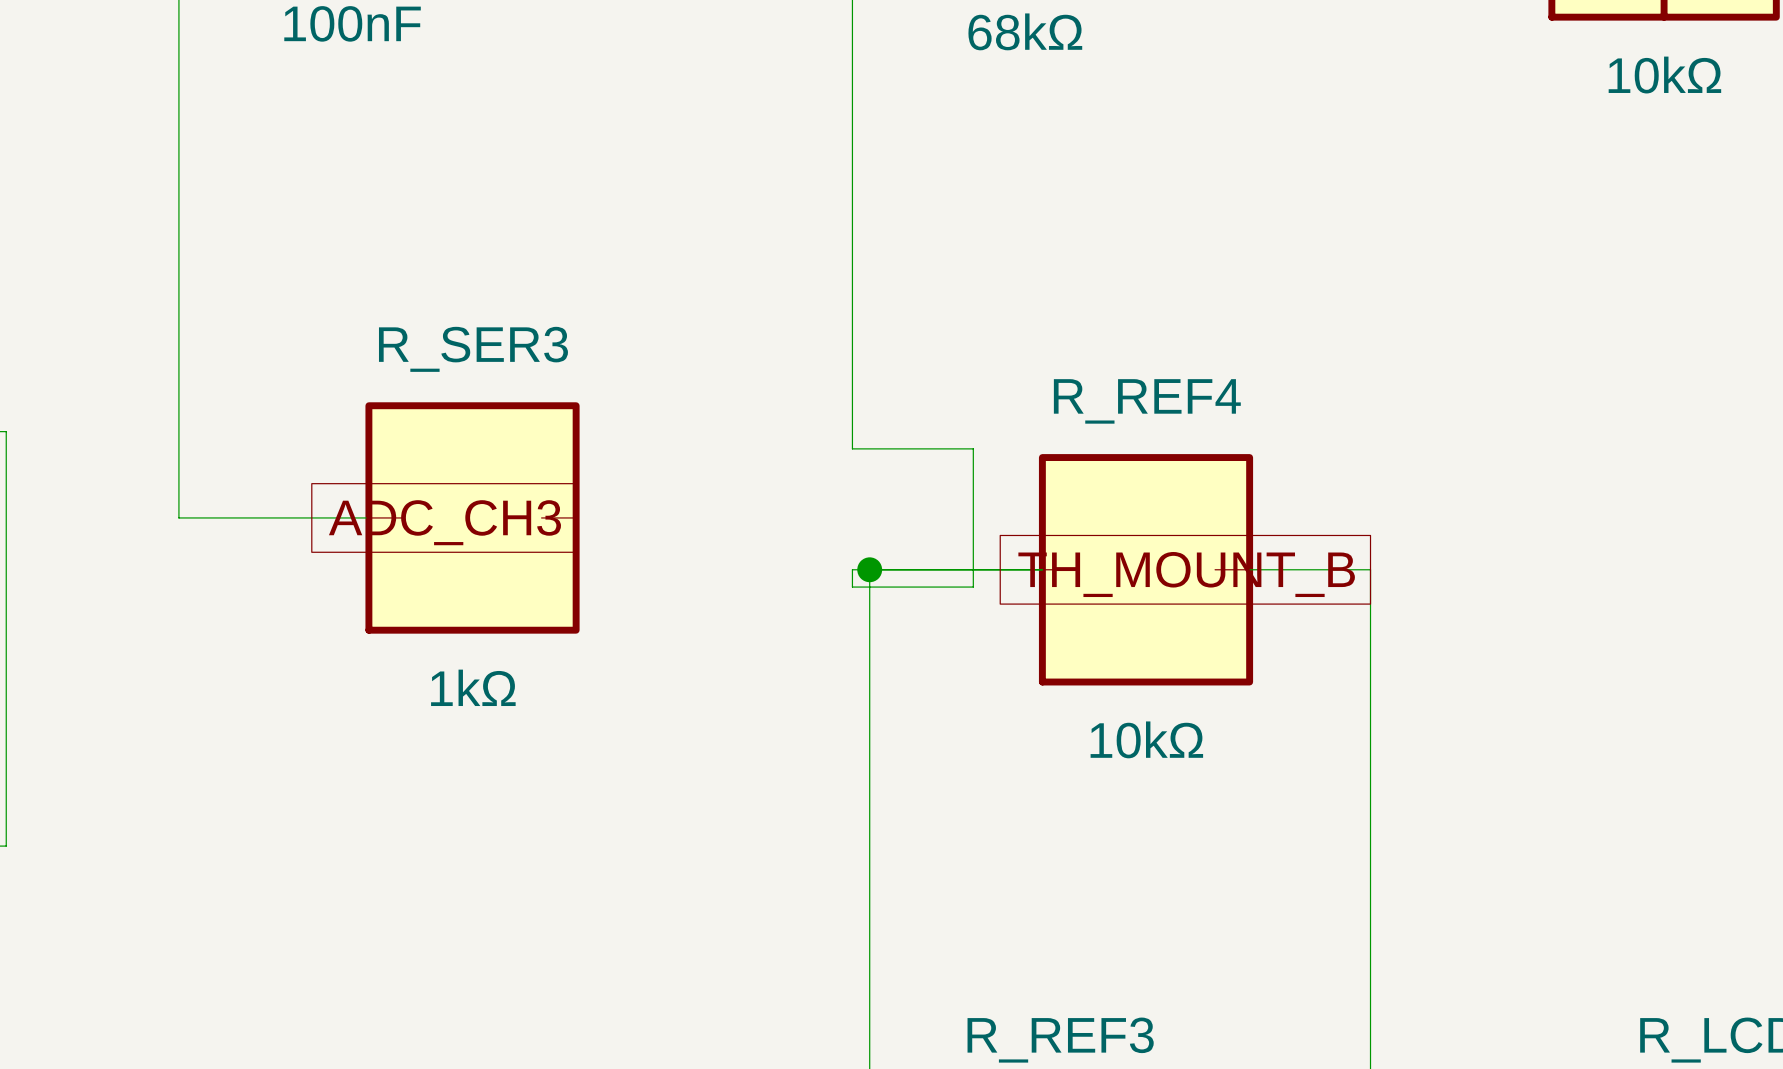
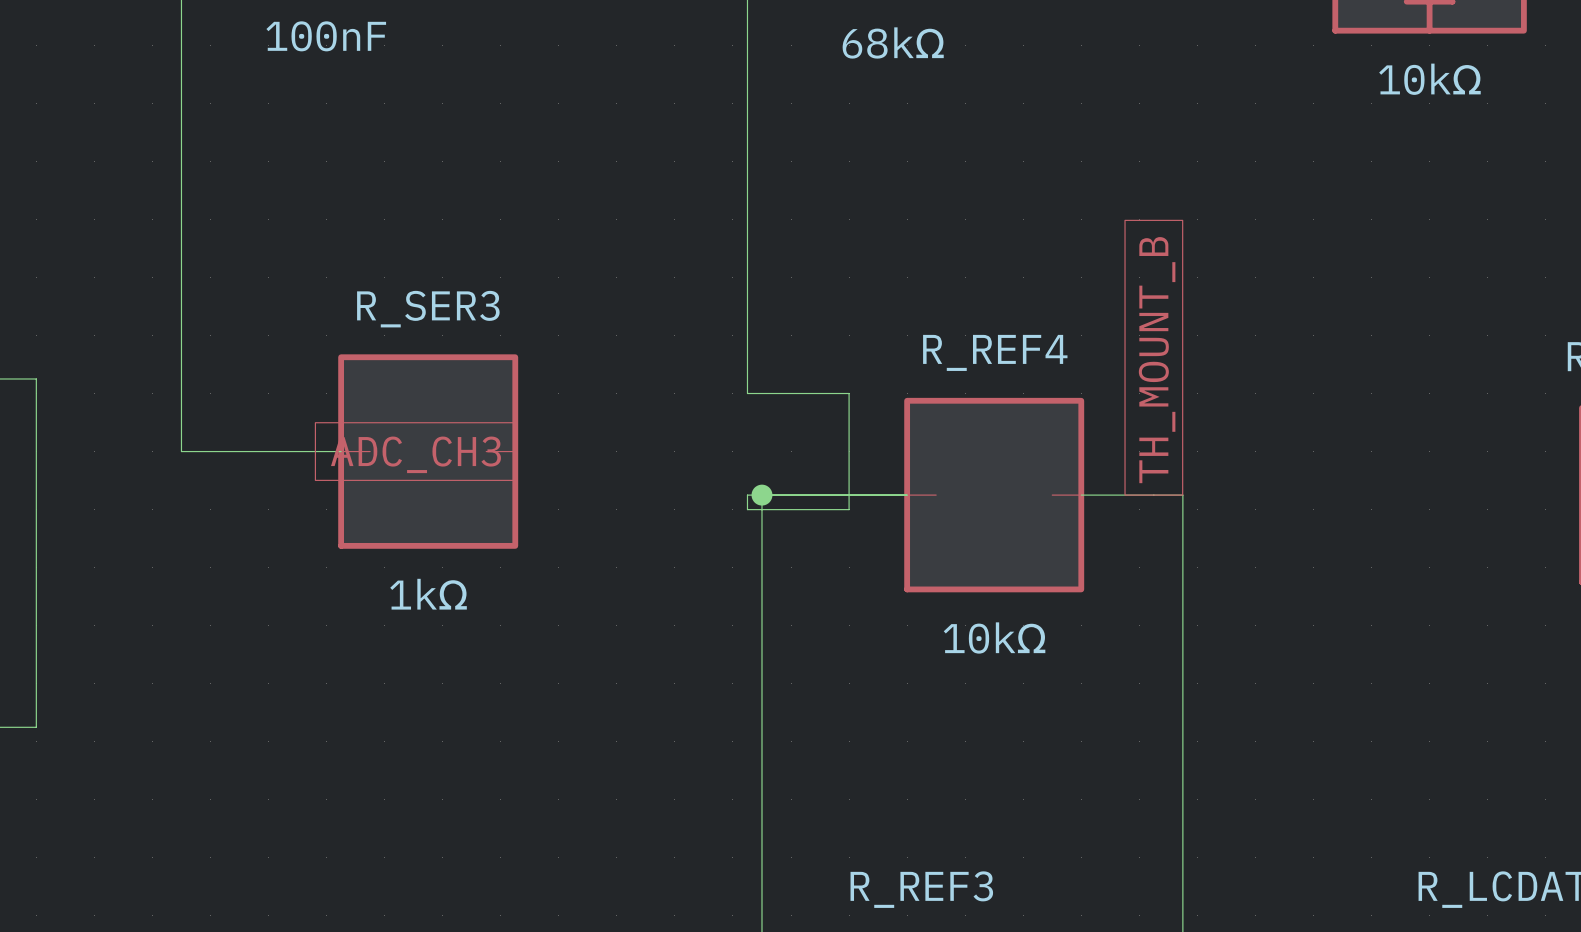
global label rotation: 0° (1186, 574) -> 90° clockwise (1157, 360)

